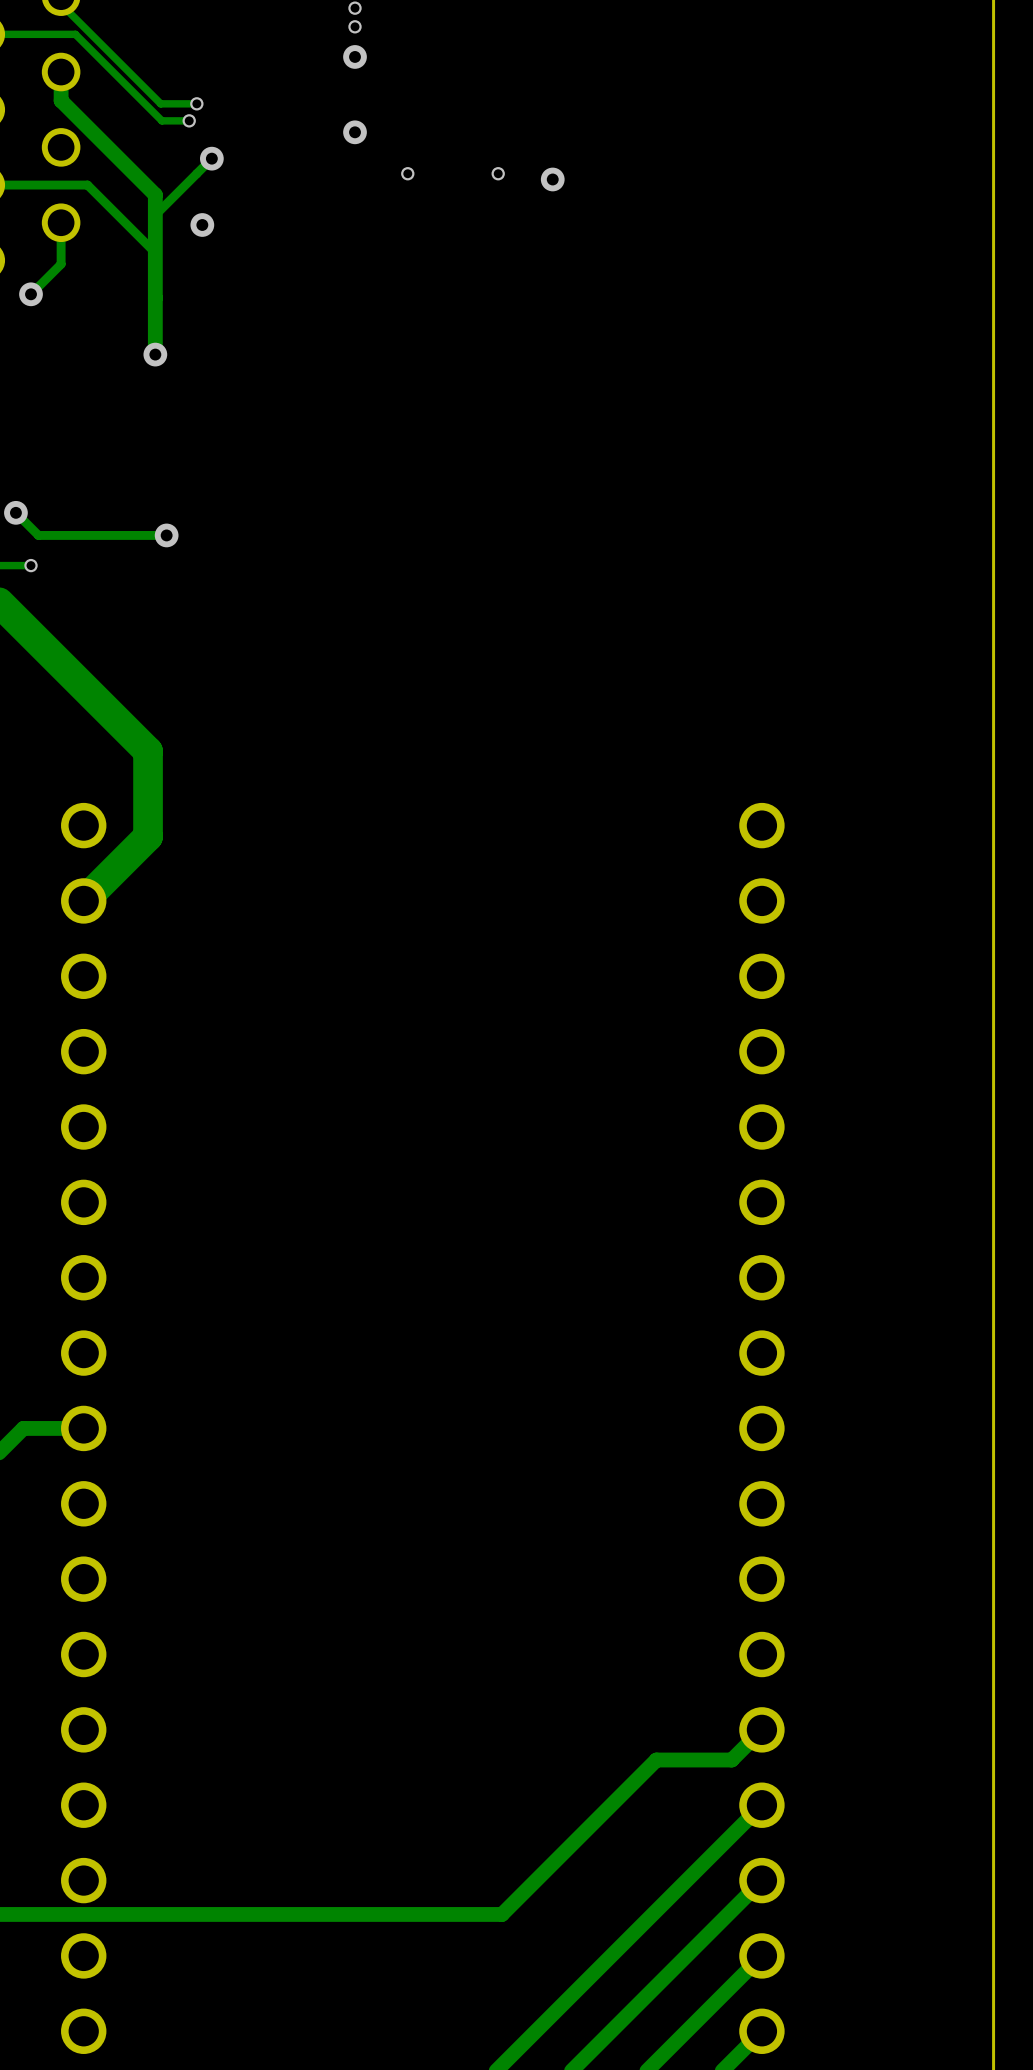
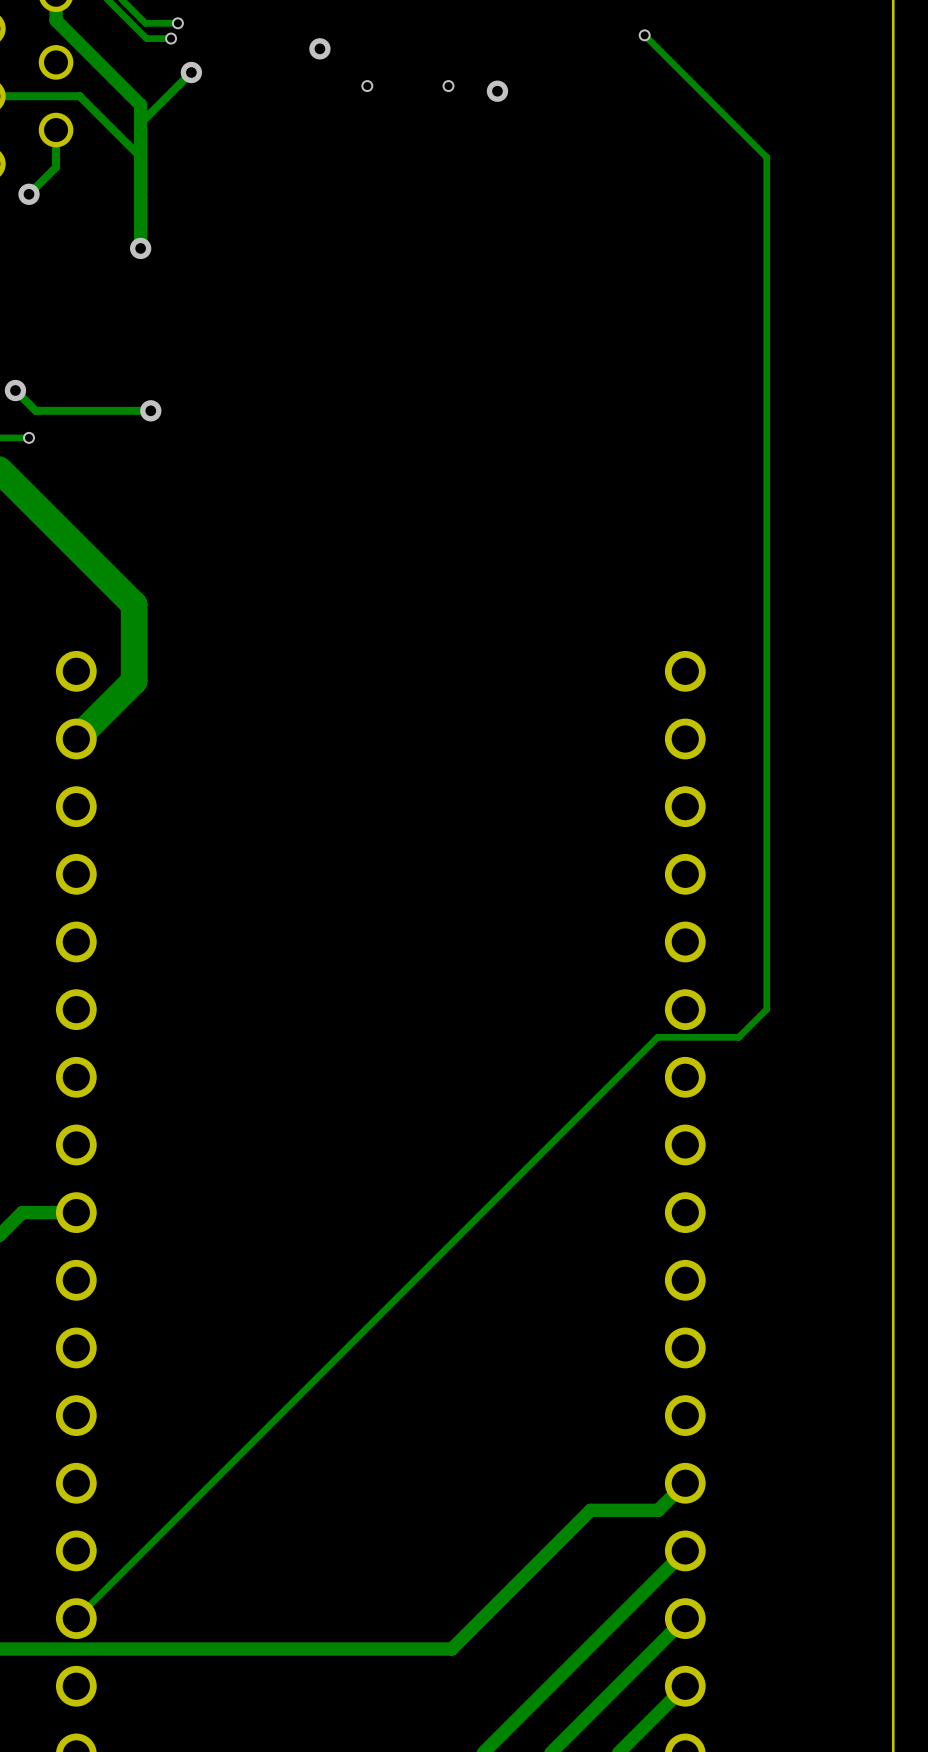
track: none -> (644, 35) (766, 157) (766, 1009) (738, 1037) (657, 1037) (76, 1618)
via: none -> (644, 35)
via: (202, 224) -> none

